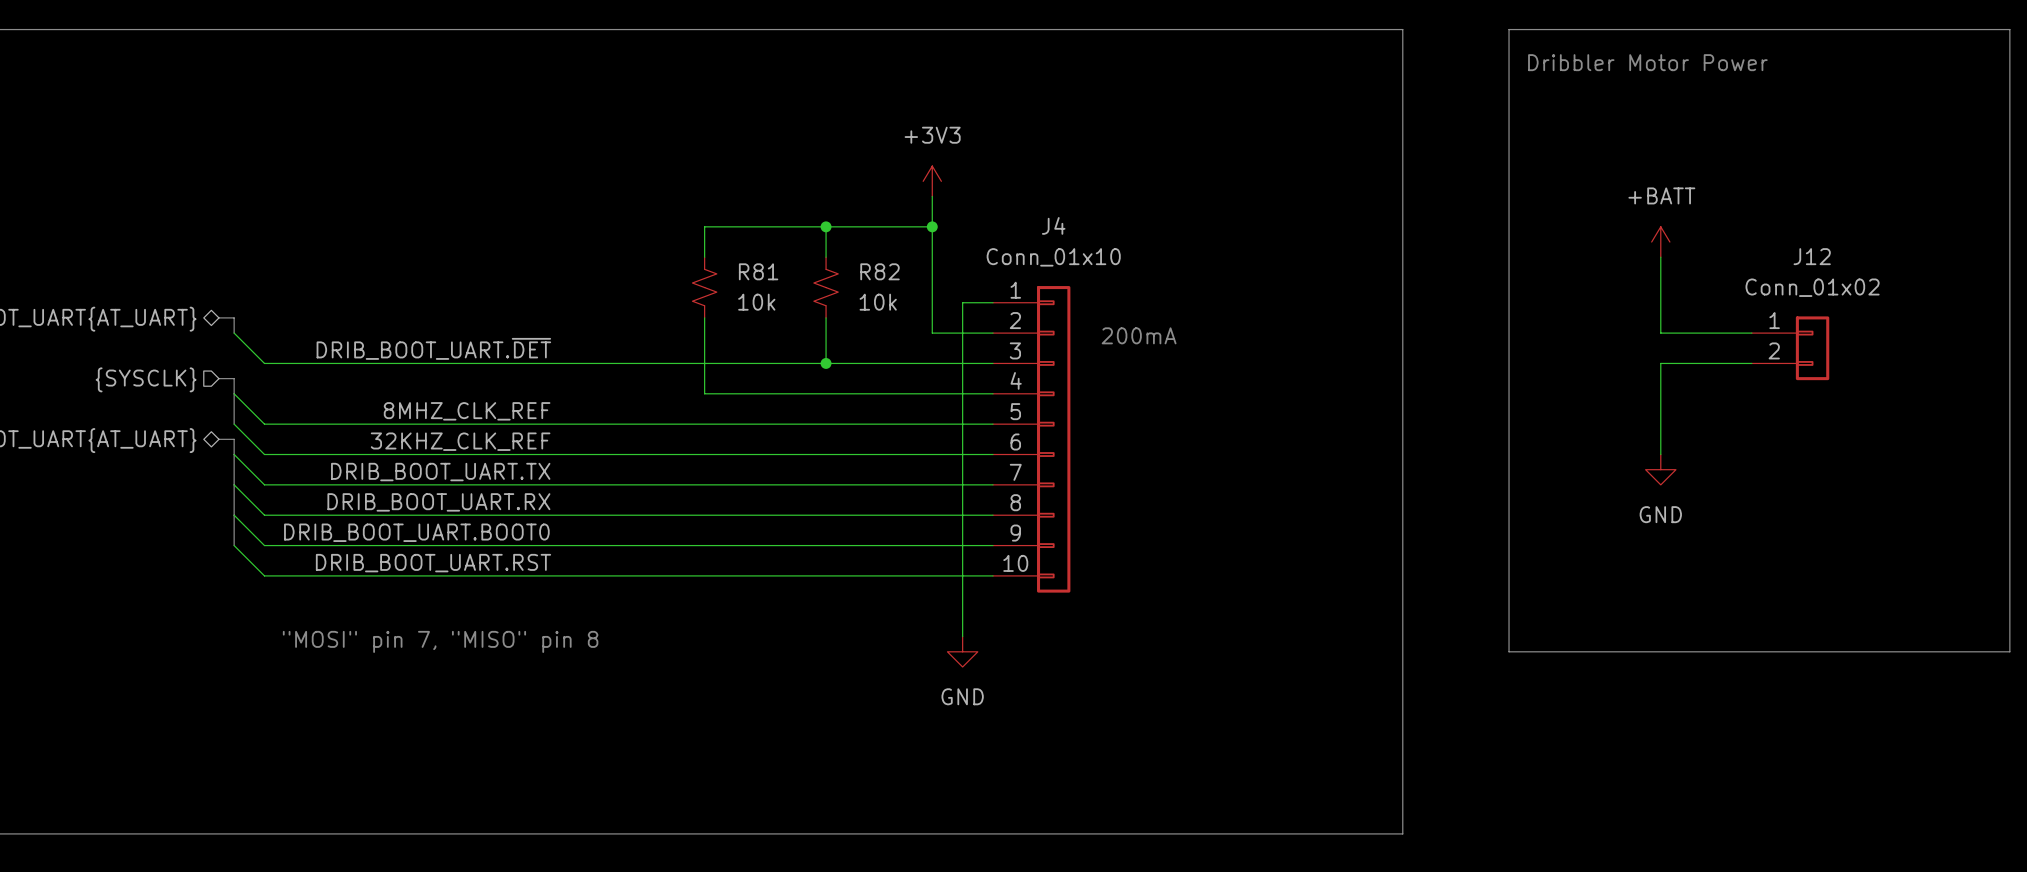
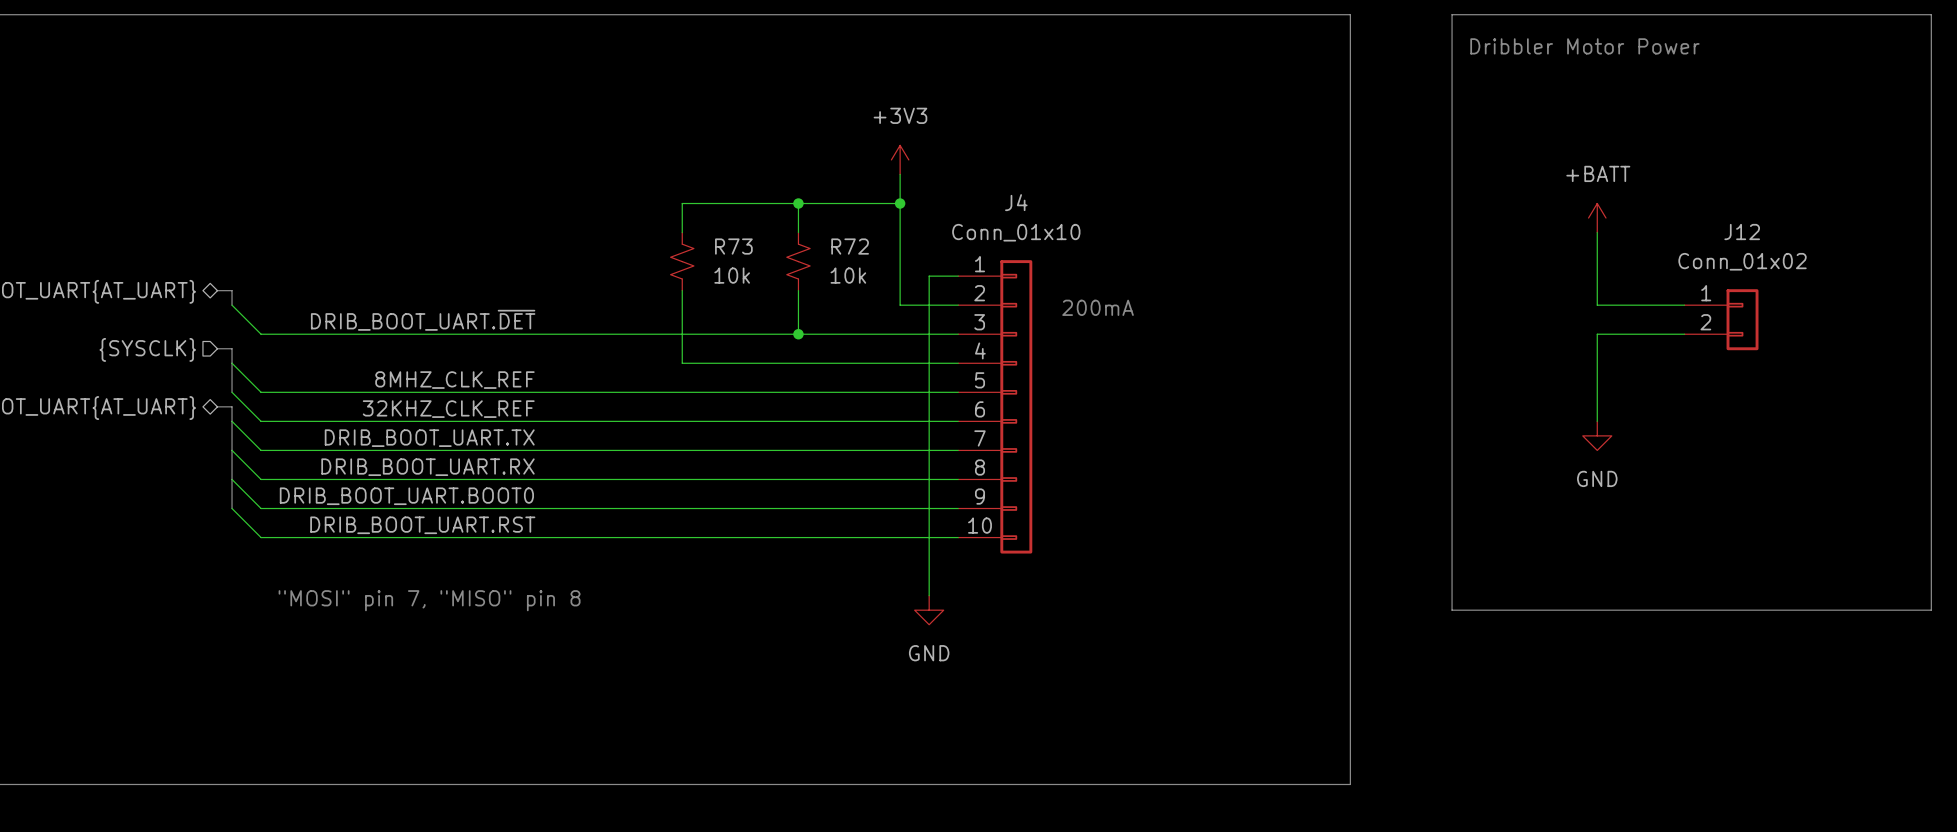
R81 name: R81 (758, 271) -> R73 (733, 246)
R82 name: R82 (880, 271) -> R72 (850, 246)

